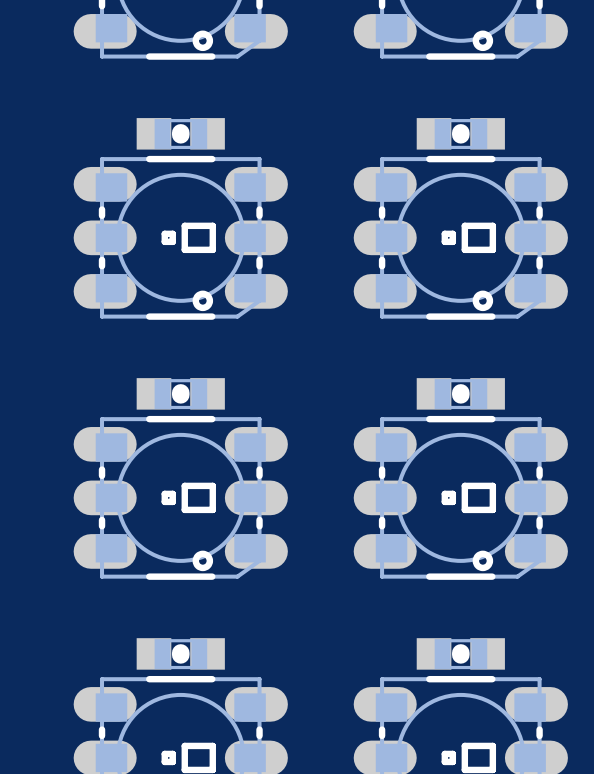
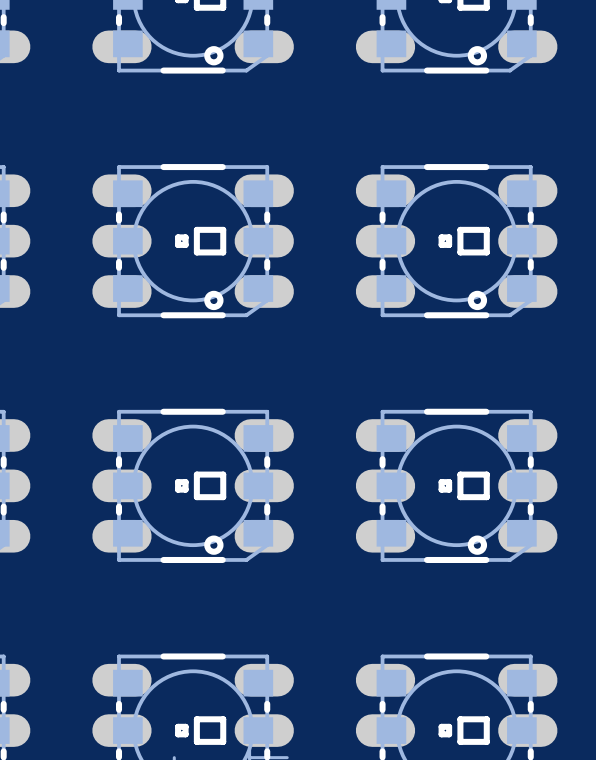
part: (180, 133) -> none
part: (460, 133) -> none
part: (180, 393) -> none
part: (460, 393) -> none
part: (180, 653) -> none
part: (460, 653) -> none

